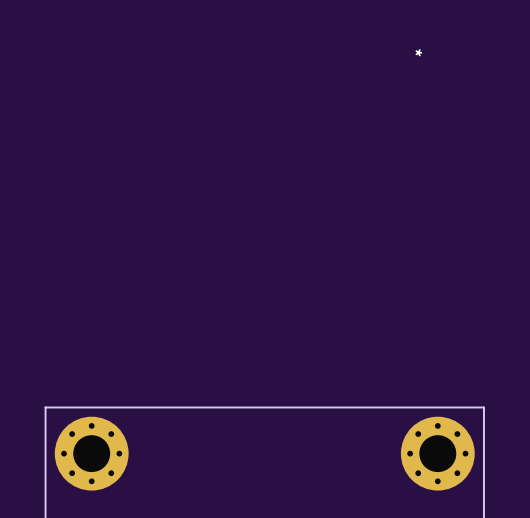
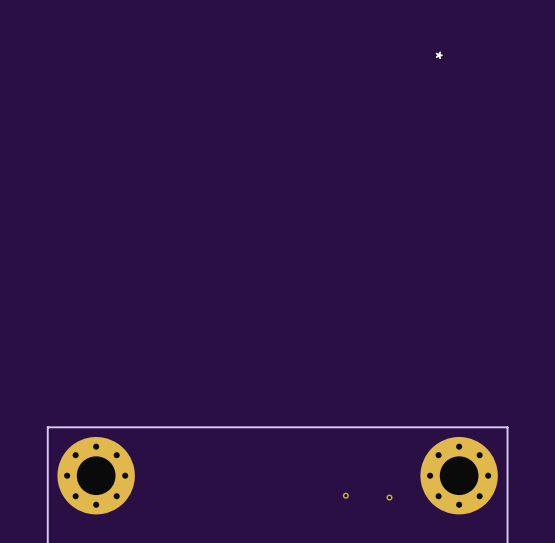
via: none -> (345, 495)
via: none -> (389, 497)

